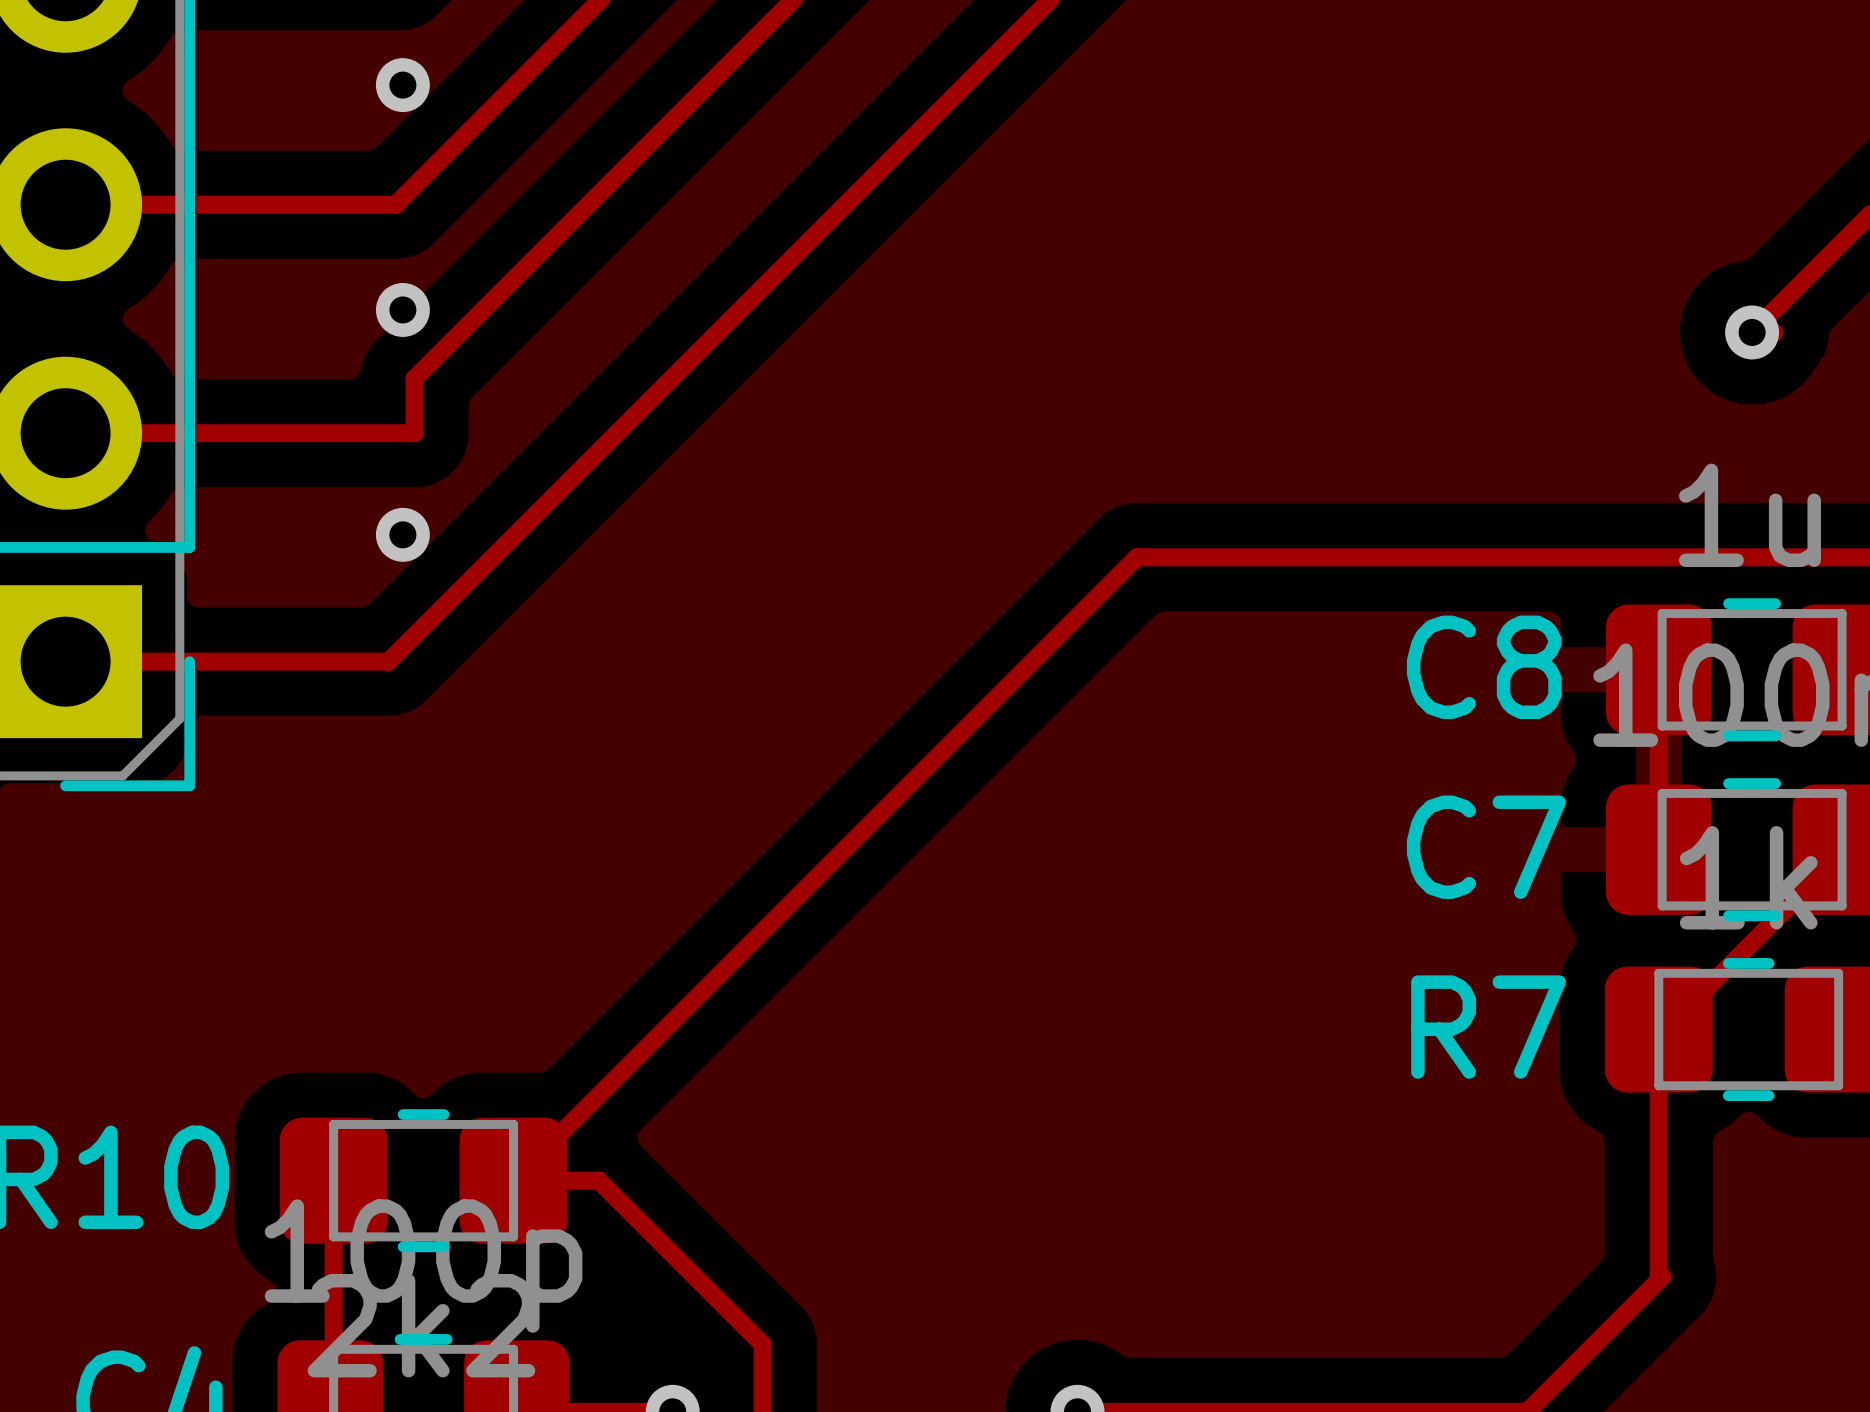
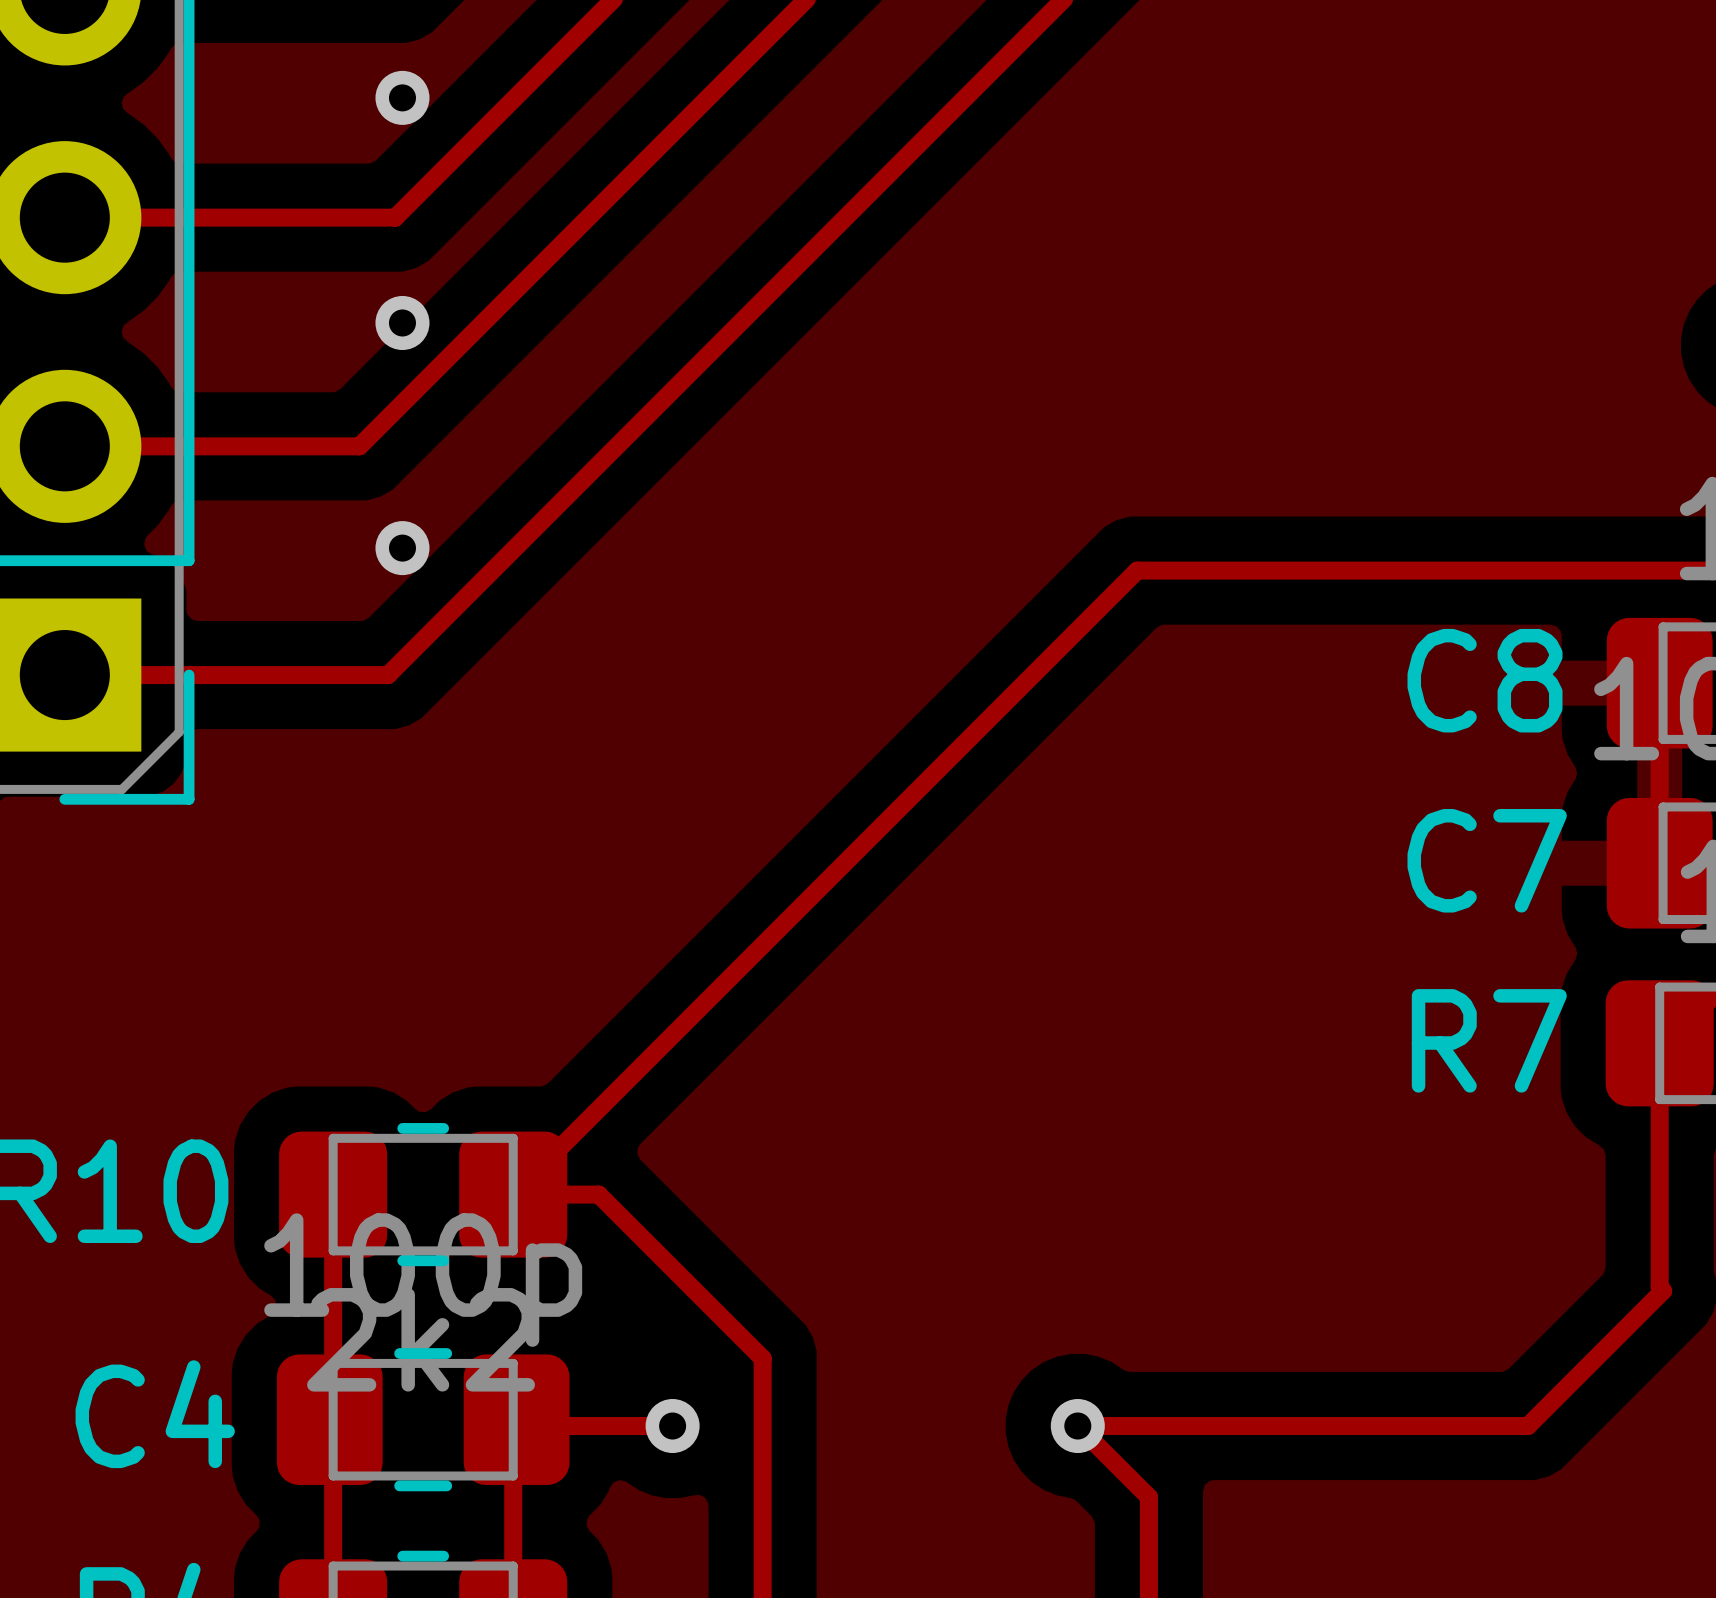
track: (414, 378) (414, 433) (359, 433) -> (414, 391) (359, 446)

